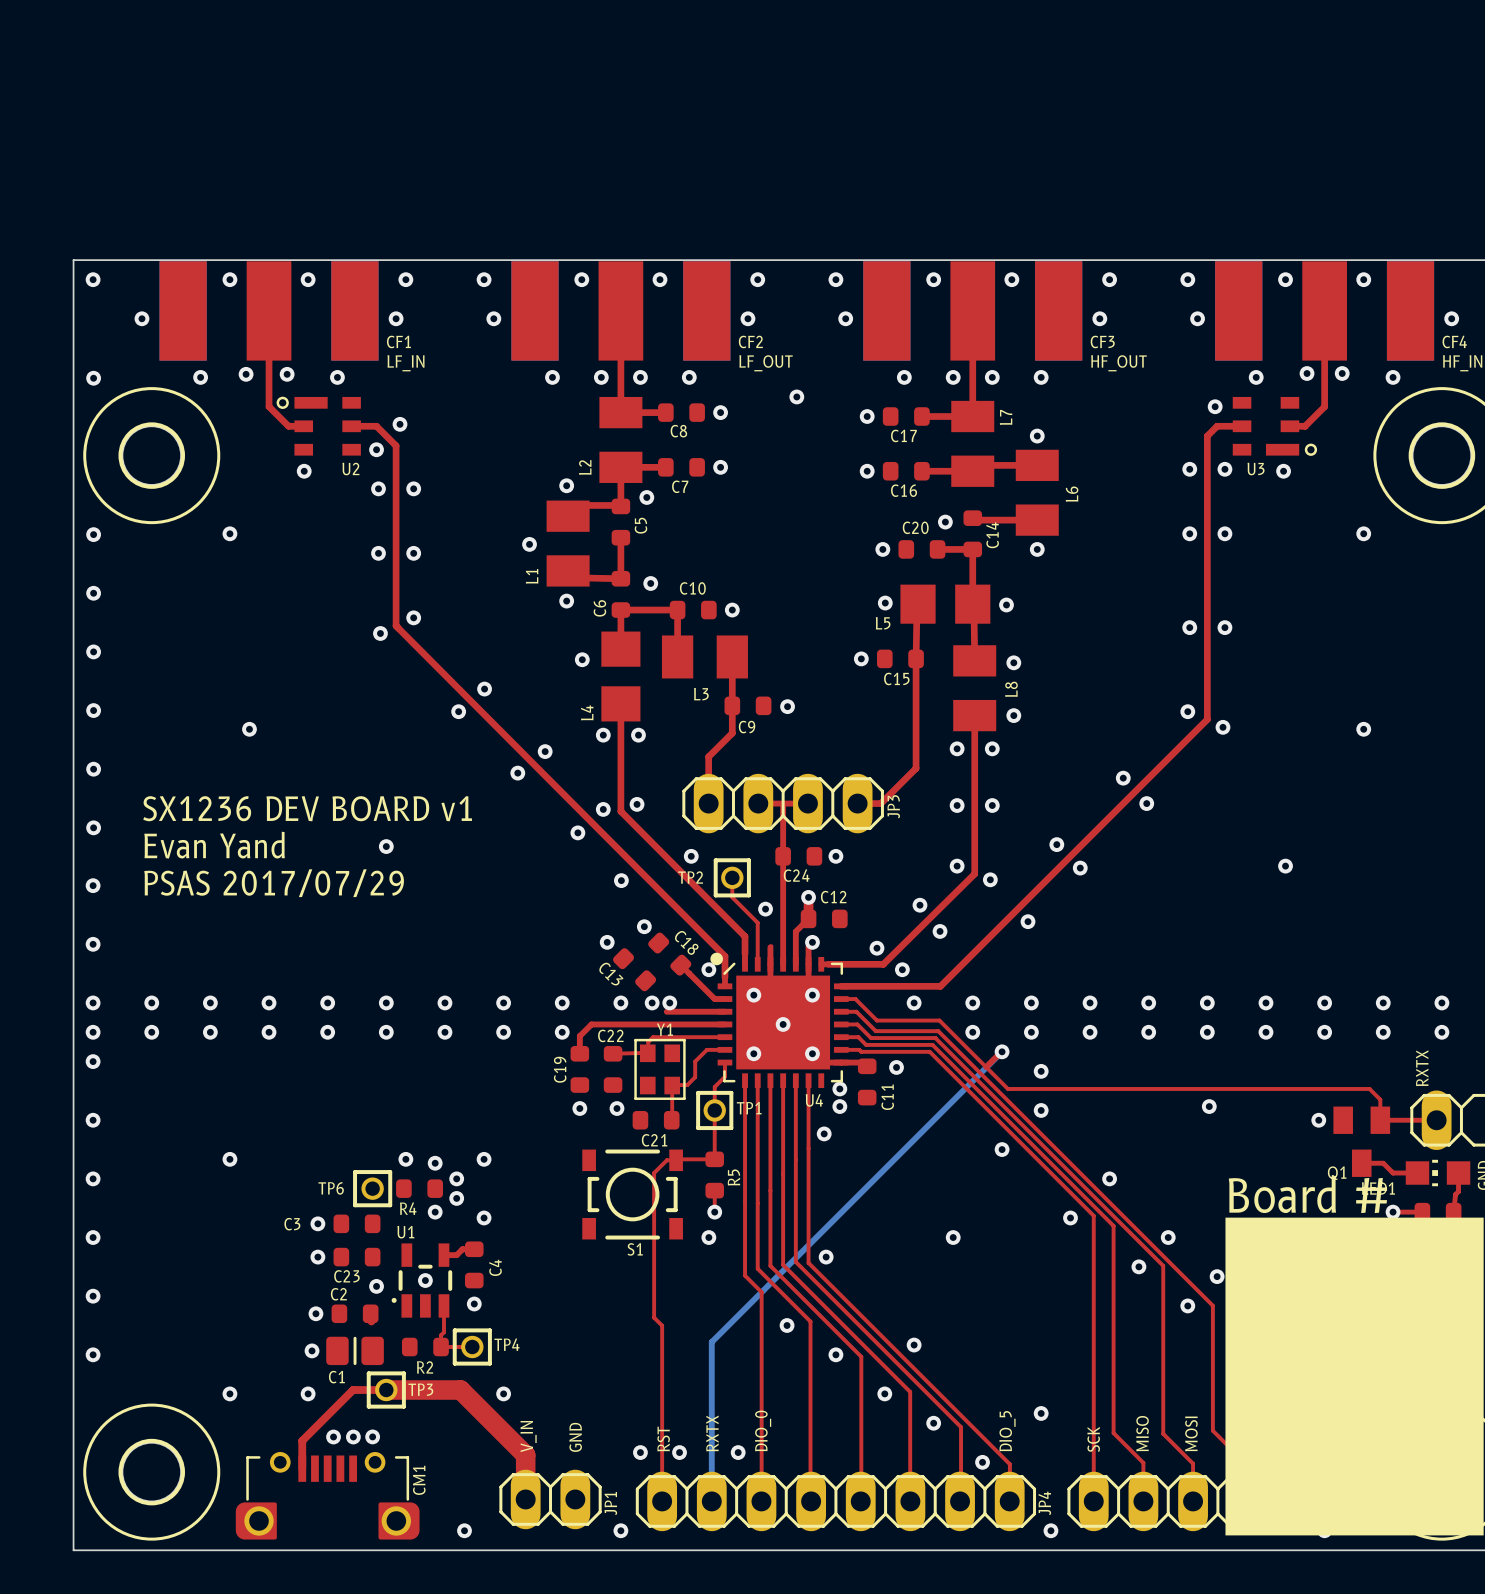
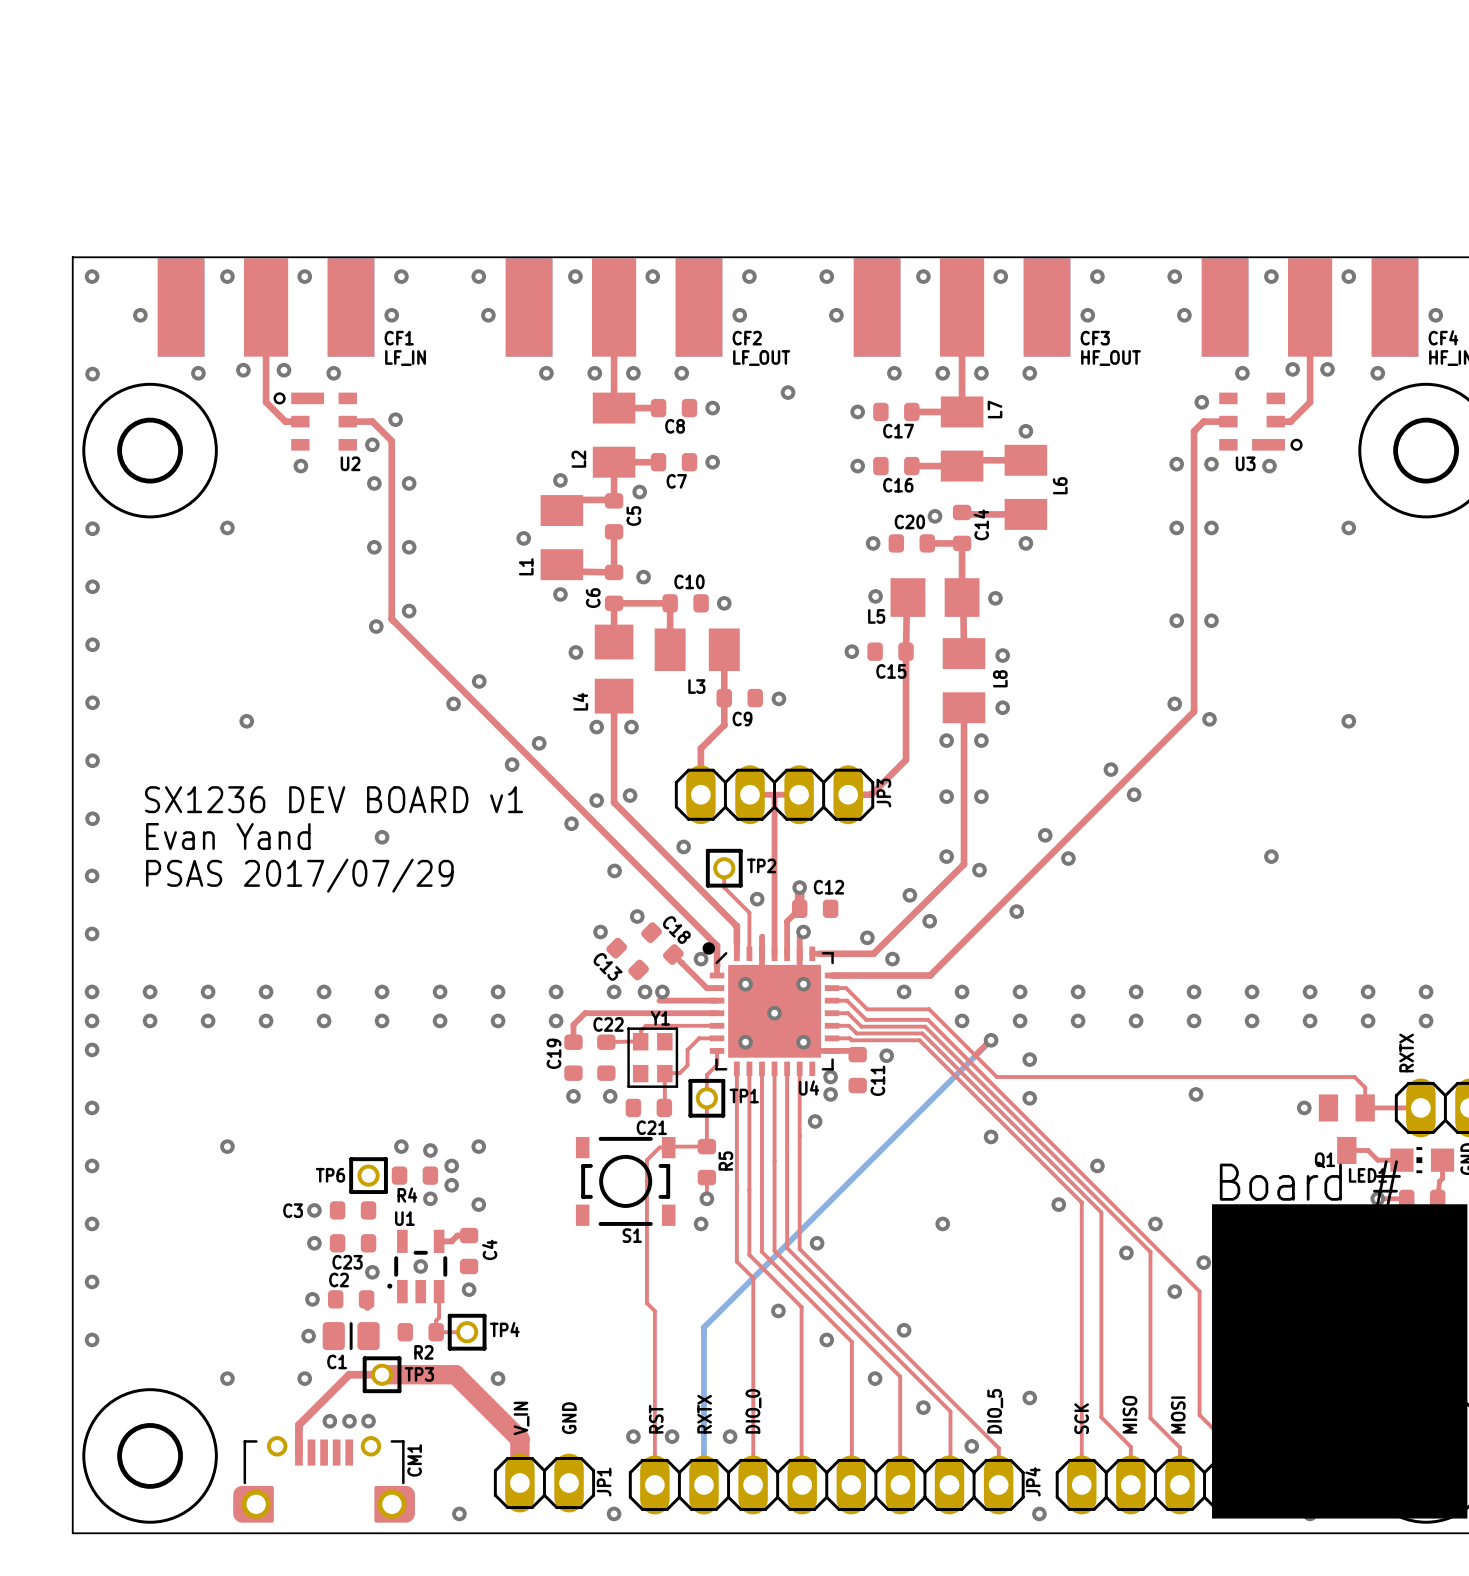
C24: (798, 856) -> none
via: (835, 856) -> none
TP2 name position: TP2 (690, 877) -> TP2 (761, 865)

